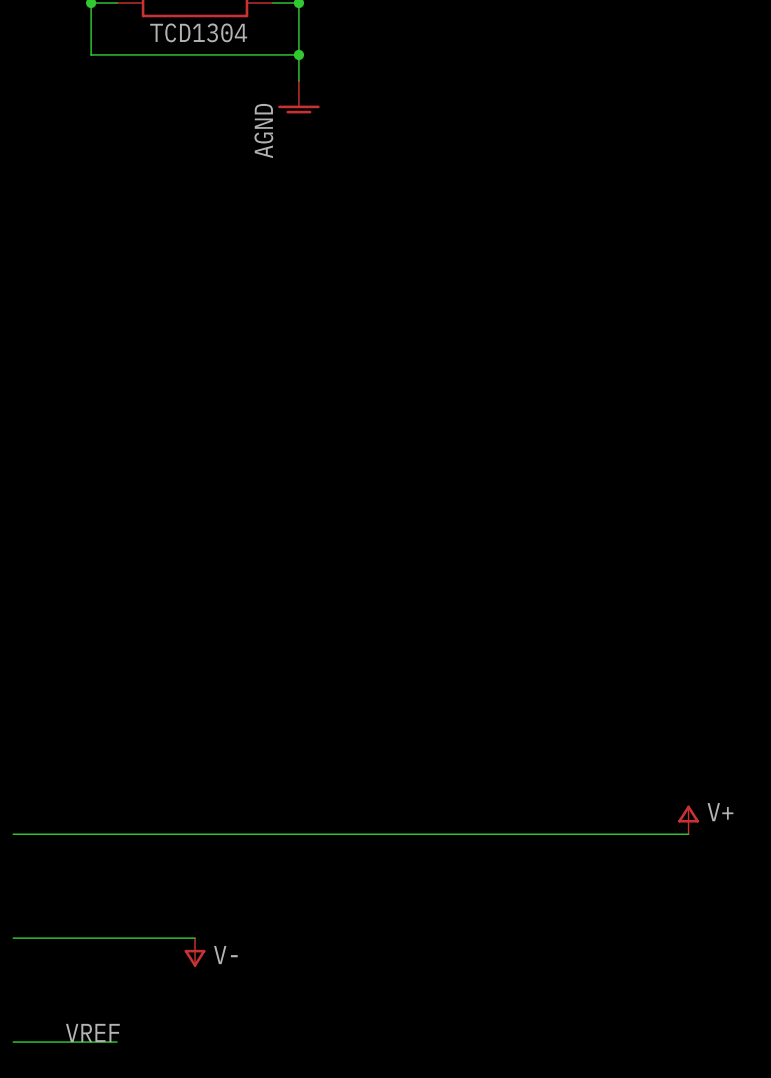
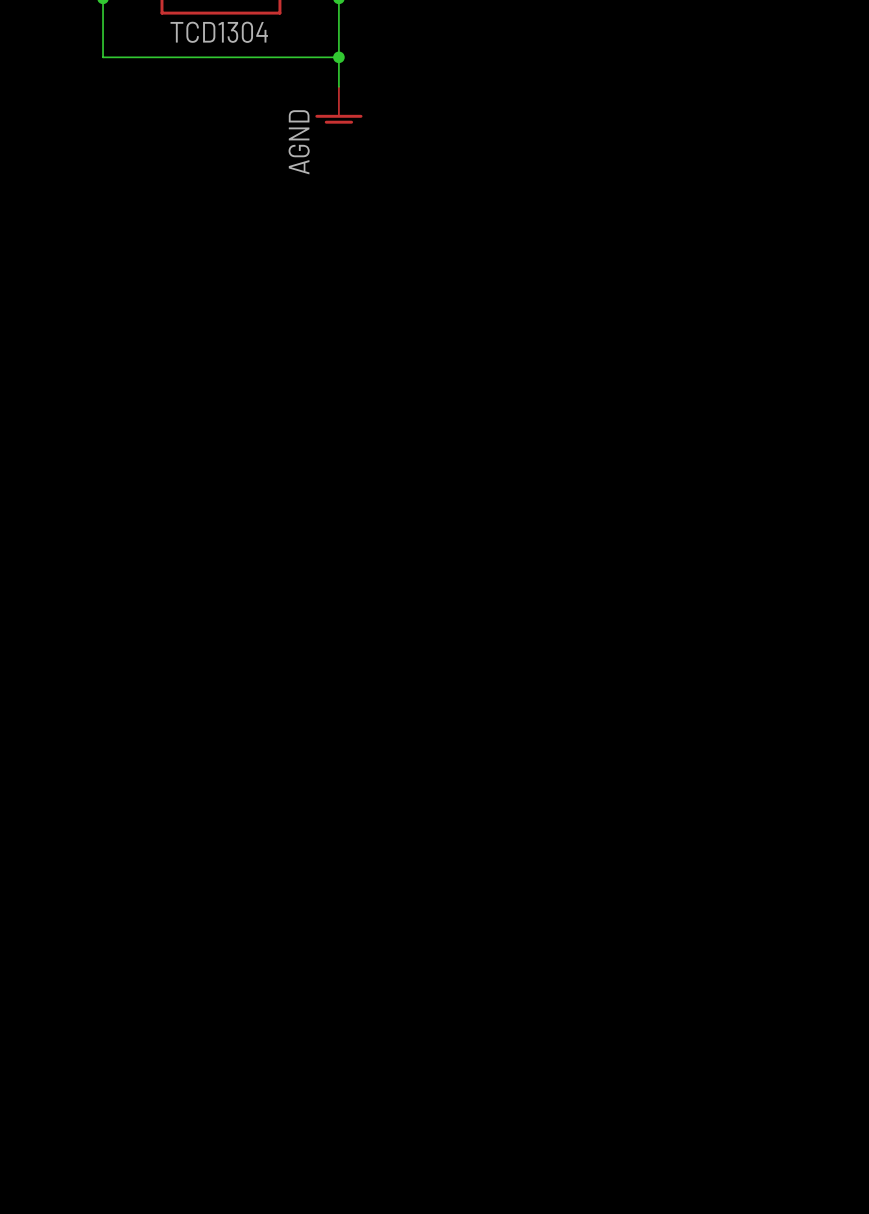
power symbol: V+ (688, 819) -> none
wire: (13, 834) (688, 834) -> none
wire: (13, 938) (195, 938) -> none
power symbol: V- (195, 952) -> none
label: VREF (92, 1032) -> none
wire: (13, 1042) (117, 1042) -> none

